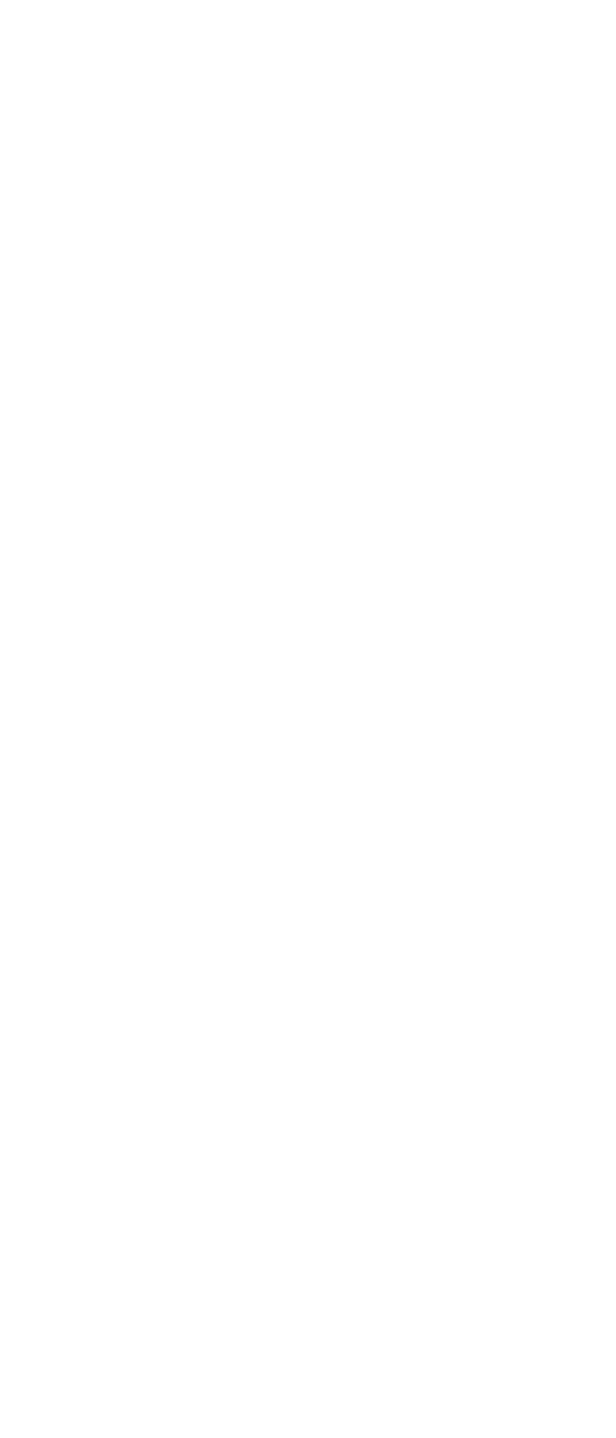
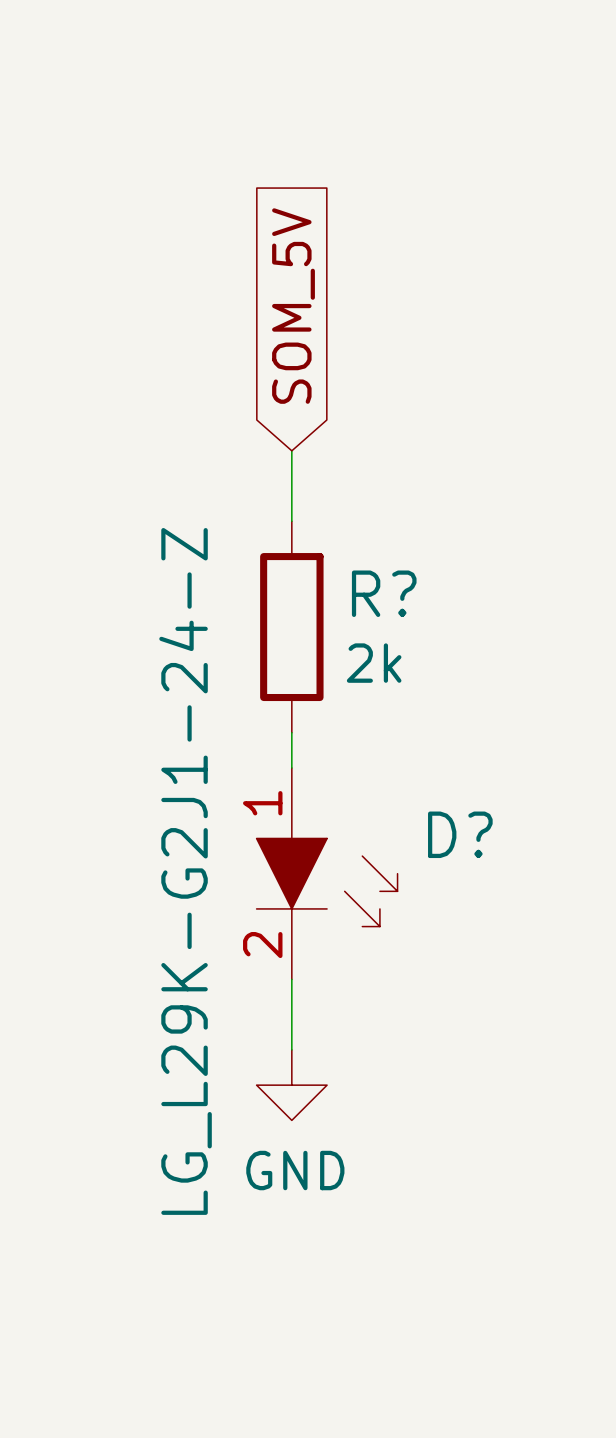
global label: none -> SOM_5V (293, 306)
wire: none -> (291, 450) (291, 521)
R?: none -> (291, 627)
wire: none -> (291, 732) (291, 767)
D?: none -> LG_L29K-G2J1-24-Z (327, 873)
wire: none -> (291, 979) (291, 1049)
power symbol: none -> GND (291, 1085)

